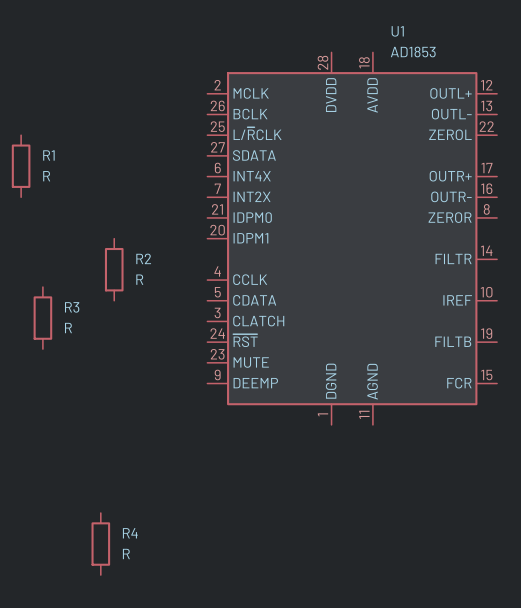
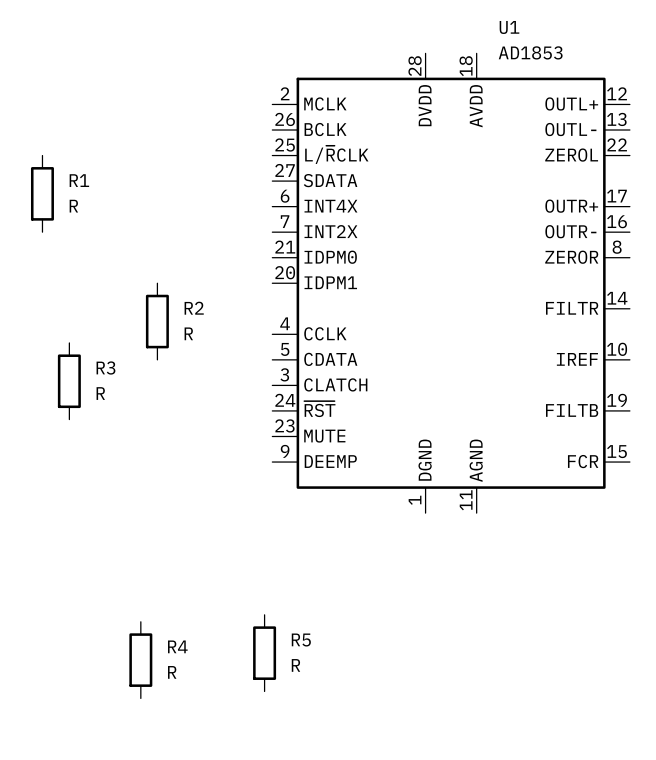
R5: none -> R (264, 653)

